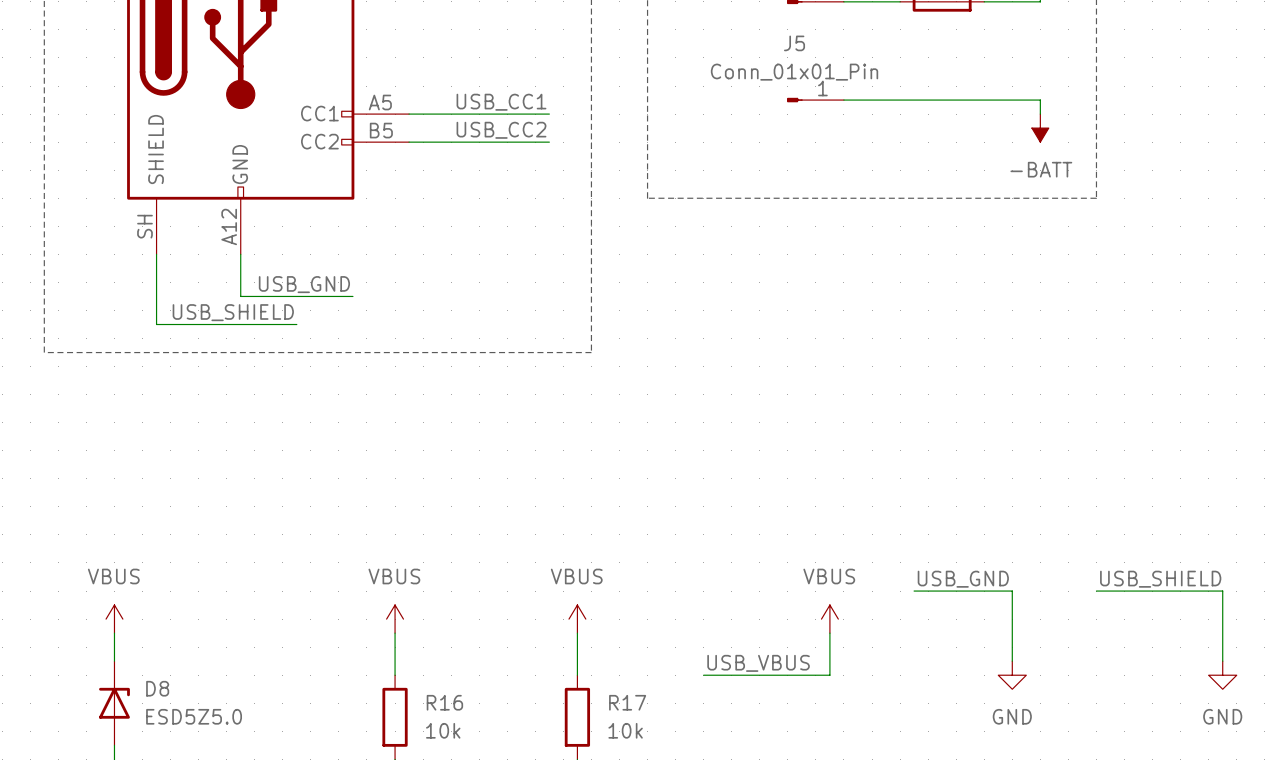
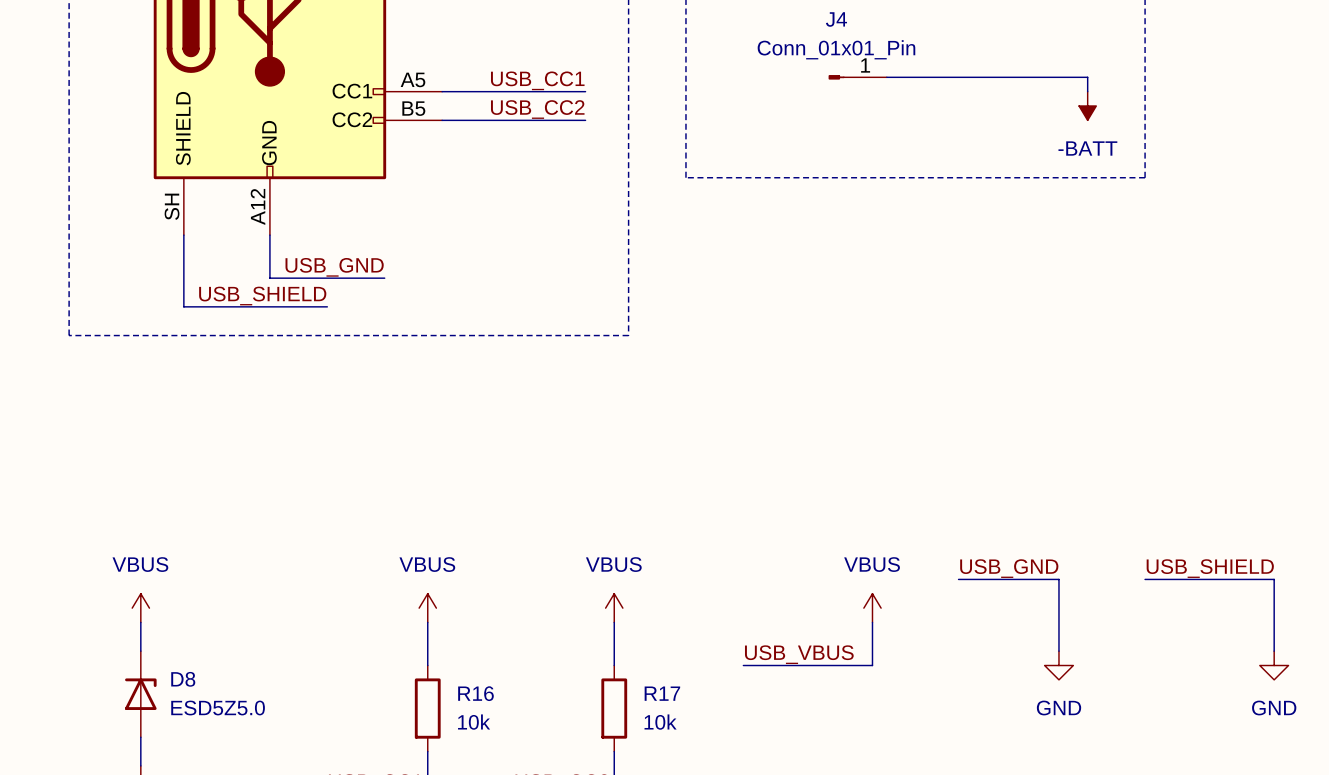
J5 name: J5 (794, 43) -> J4 (836, 19)

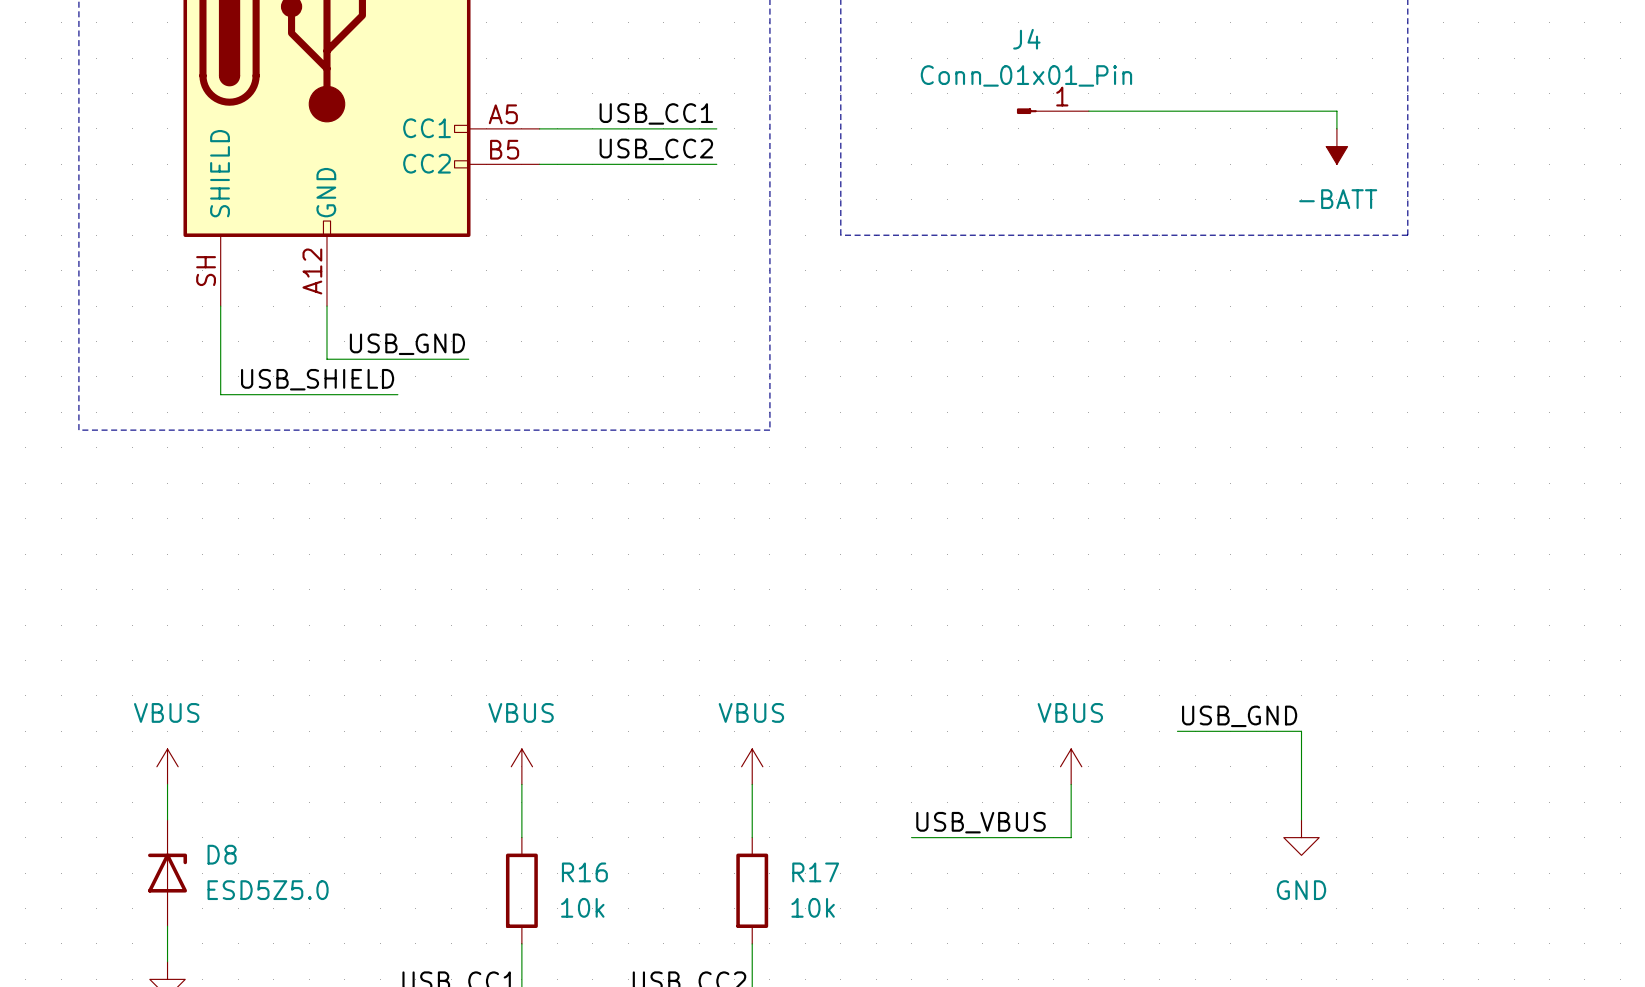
label: USB_SHIELD (1210, 568) -> none
wire: (1145, 579) (1274, 579) (1274, 651) -> none
power symbol: GND (1274, 665) -> none

